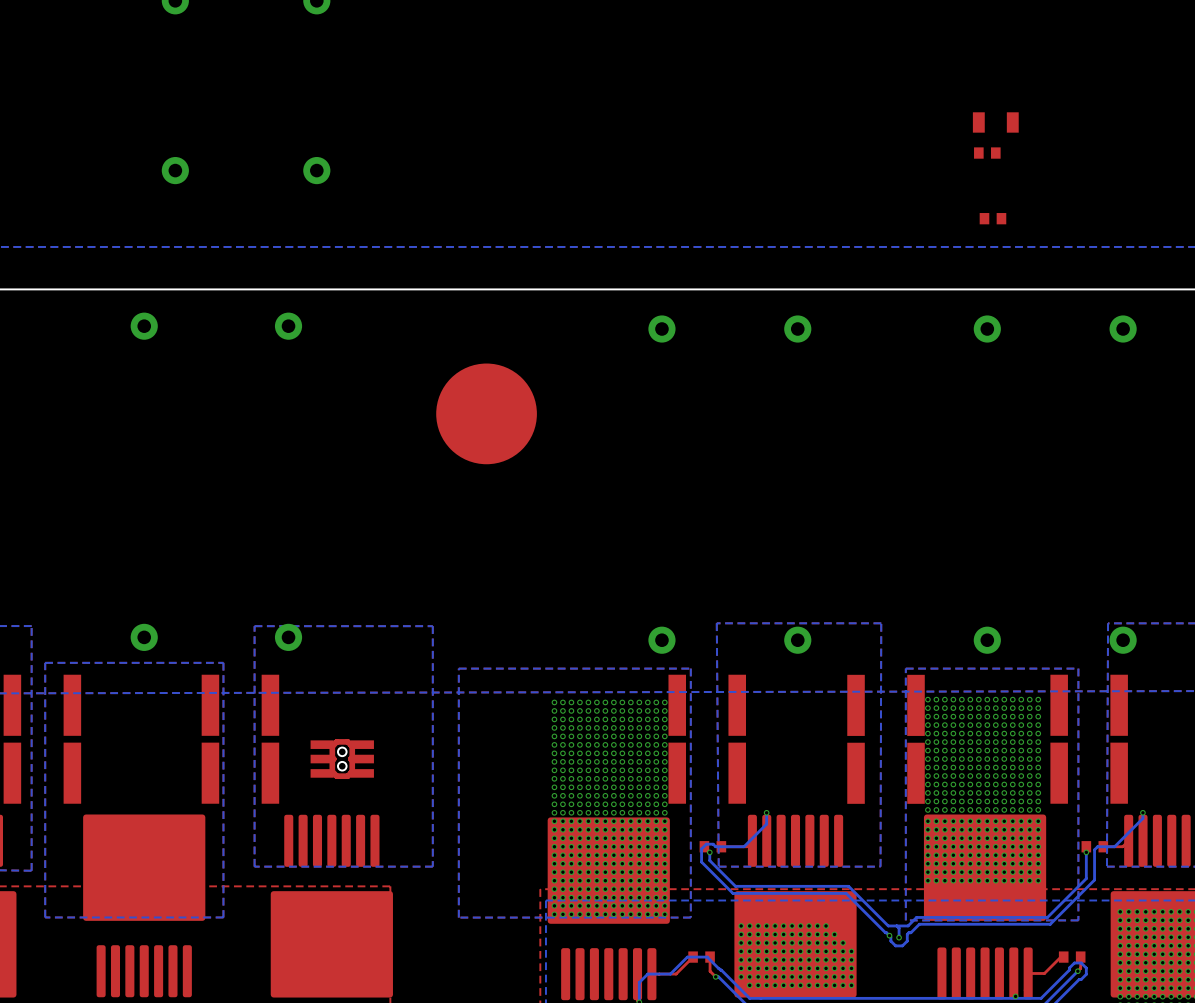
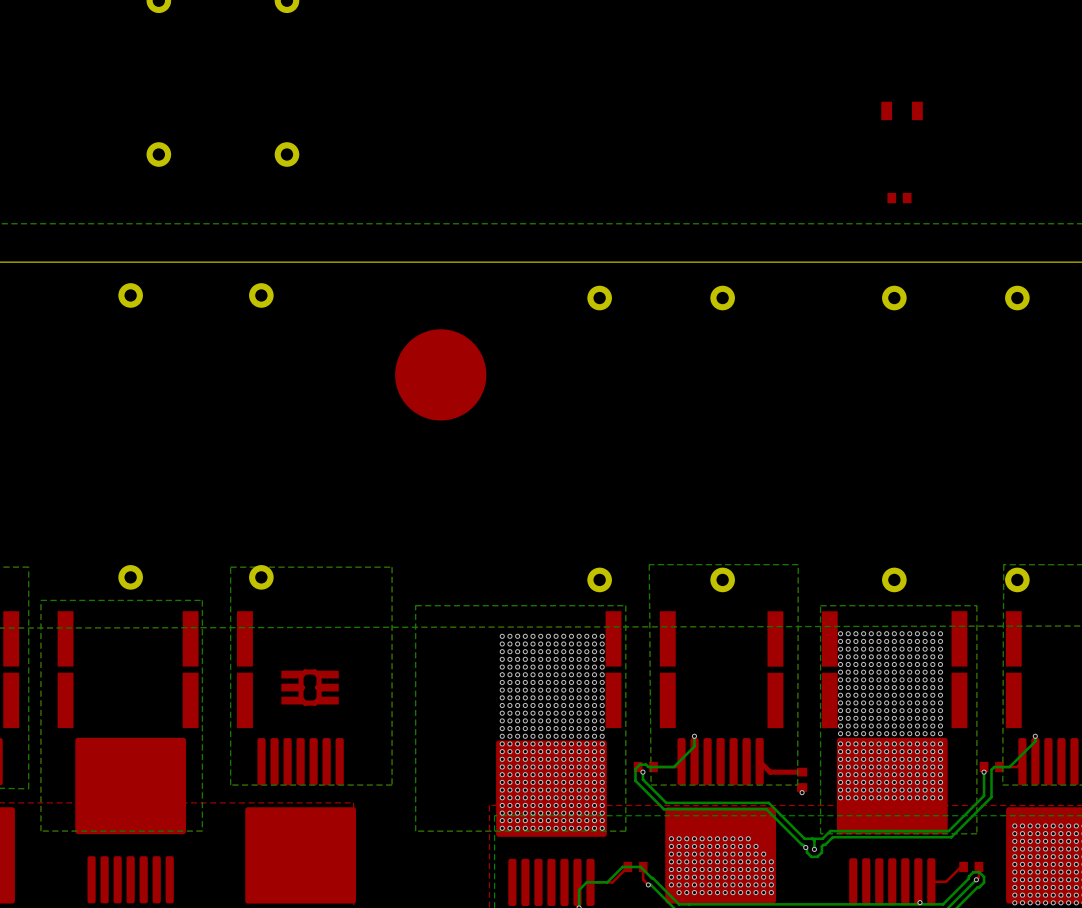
part: (987, 153) -> none
part footprint: [310, 740, 374, 778] -> [281, 670, 339, 705]
top track: none -> (759, 761) (770, 772) (802, 772)
part: none -> (802, 779)
via: none -> (802, 792)

